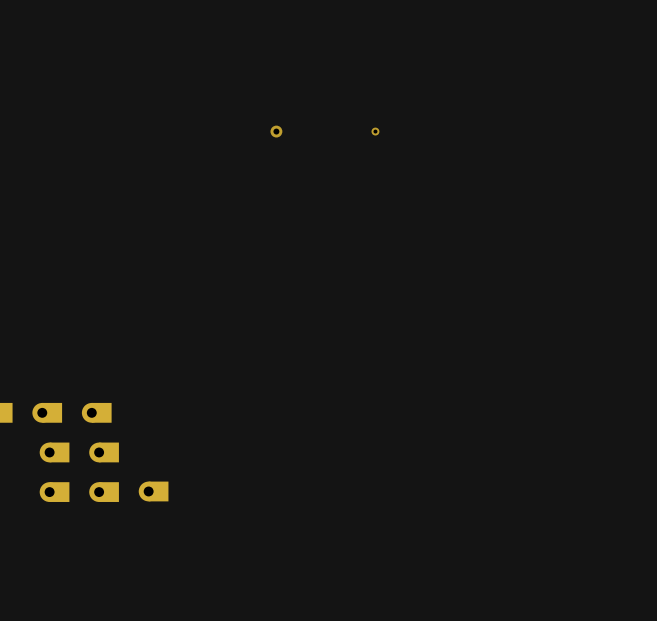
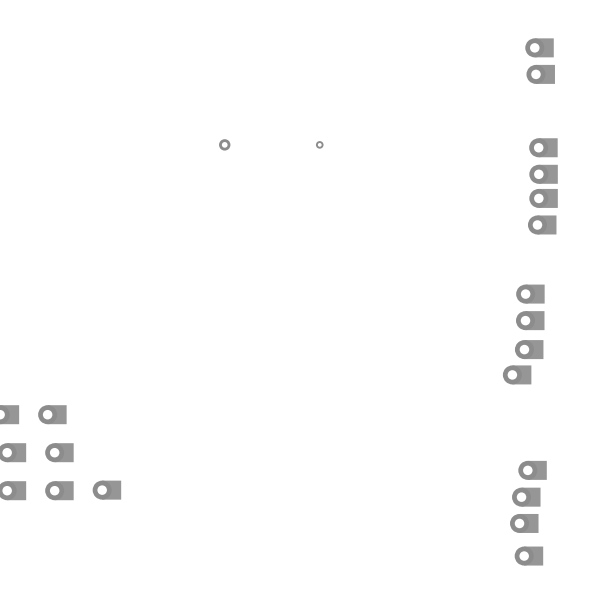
part: none -> (539, 47)
part: none -> (540, 74)
part: none -> (543, 147)
part: none -> (543, 174)
part: none -> (543, 198)
part: none -> (542, 224)
part: none -> (530, 294)
part: none -> (530, 320)
part: none -> (529, 349)
part: none -> (517, 374)
part: none -> (532, 470)
part: none -> (526, 497)
part: none -> (524, 523)
part: none -> (528, 556)

